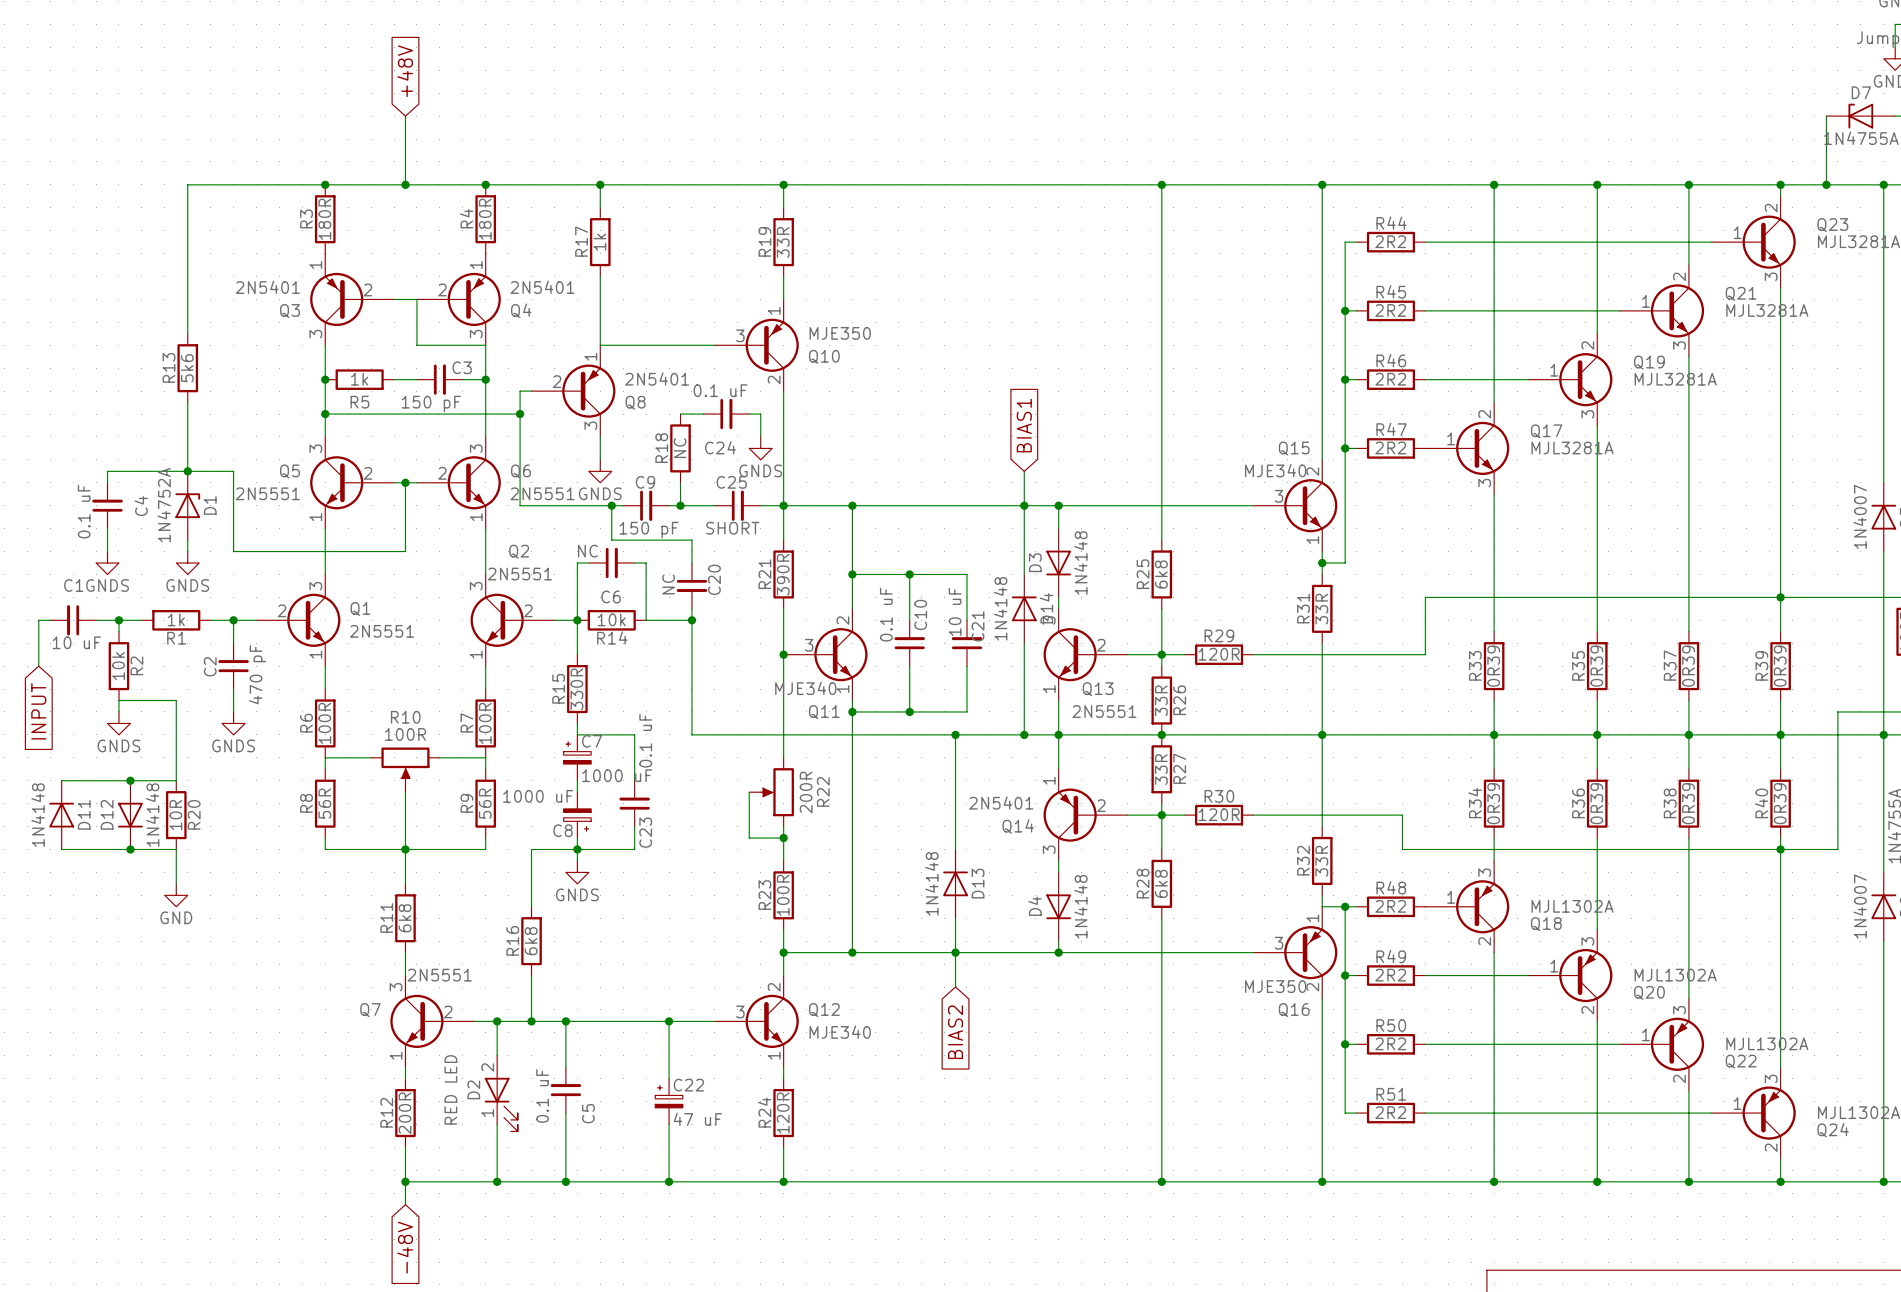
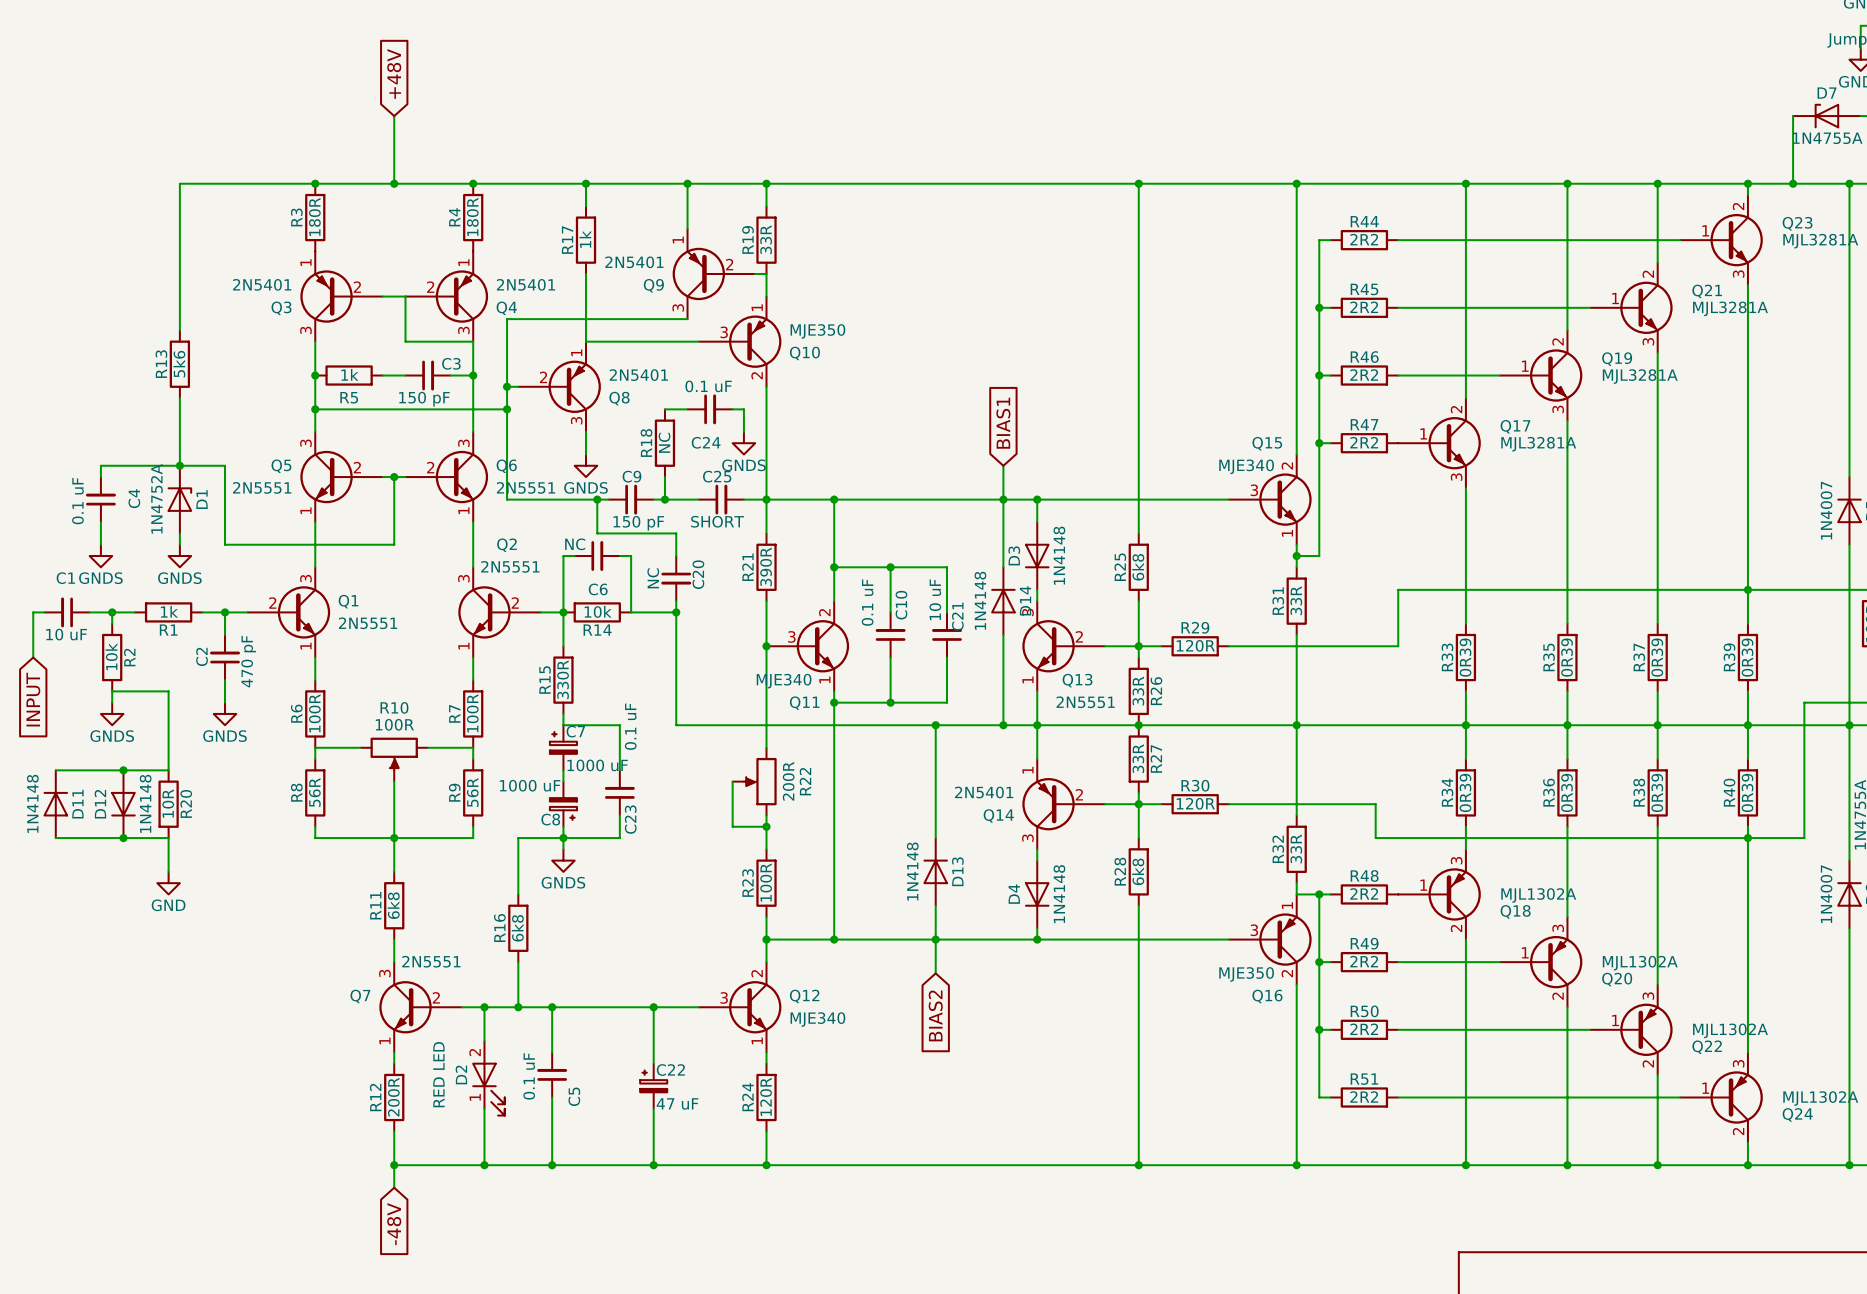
wire: none -> (687, 183) (687, 228)
junction: none -> (687, 183)
Q9: none -> 2N5401 (713, 273)
wire: none -> (755, 273) (766, 273)
wire: none -> (687, 319) (507, 319) (507, 386)
junction: none -> (507, 386)

